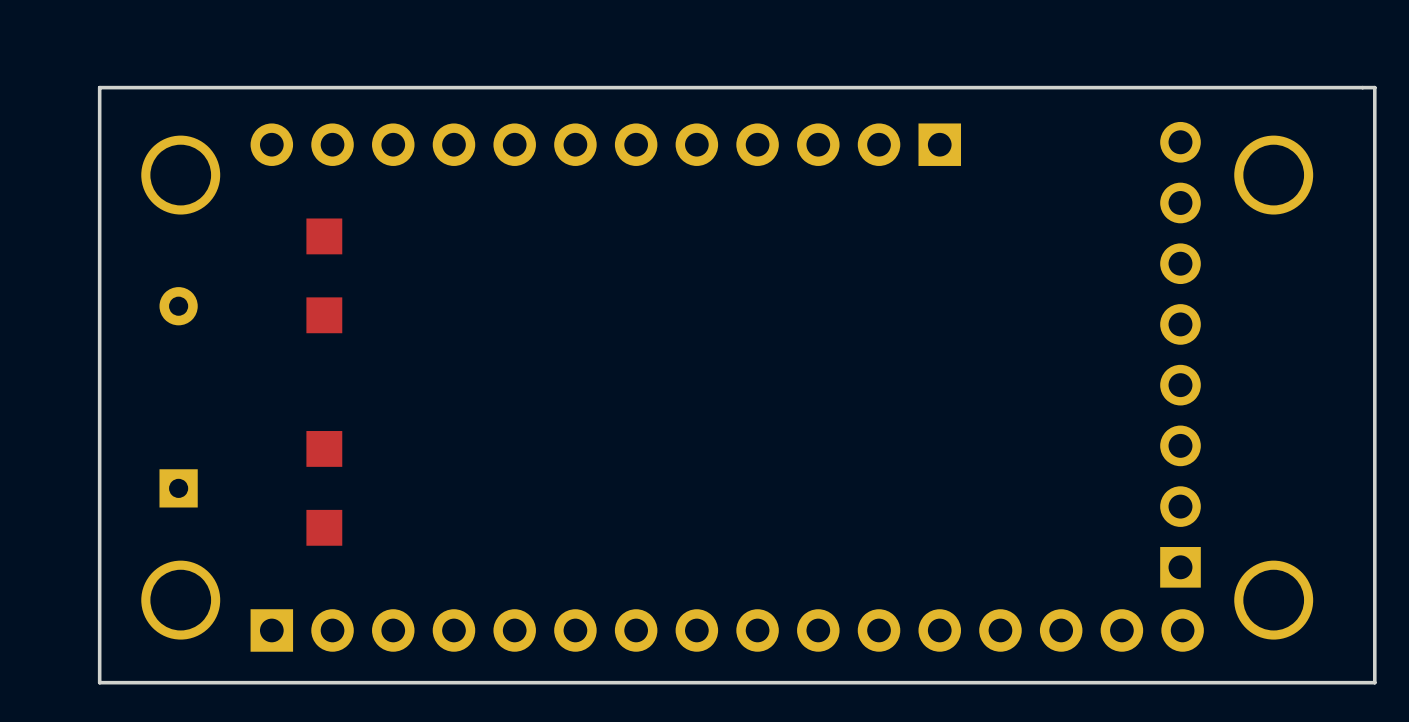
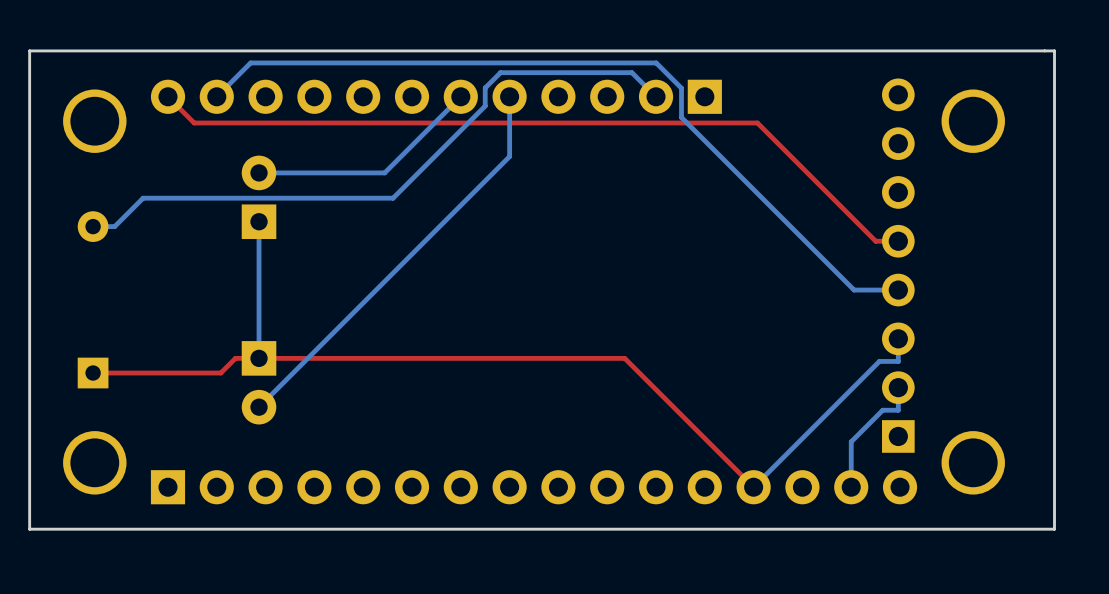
top track: none -> (168, 96) (194, 122) (757, 122) (875, 241) (898, 241)
bottom track: none -> (216, 96) (250, 62) (656, 62) (681, 88) (681, 117) (854, 290) (898, 290)
bottom track: none -> (460, 96) (384, 172) (259, 172)
bottom track: none -> (509, 96) (509, 156) (259, 407)
bottom track: none -> (656, 96) (631, 72) (500, 72) (485, 88) (485, 106) (393, 198) (143, 198) (114, 226) (93, 226)
part: none -> (259, 197)
part: (324, 275) -> none
bottom track: none -> (259, 221) (259, 358)
bottom track: none -> (898, 338) (898, 361) (879, 361) (753, 487)
top track: none -> (93, 373) (220, 373) (235, 358) (624, 358) (753, 487)
part: (324, 488) -> none
part: none -> (259, 382)
bottom track: none -> (898, 387) (898, 410) (882, 410) (851, 441) (851, 487)

